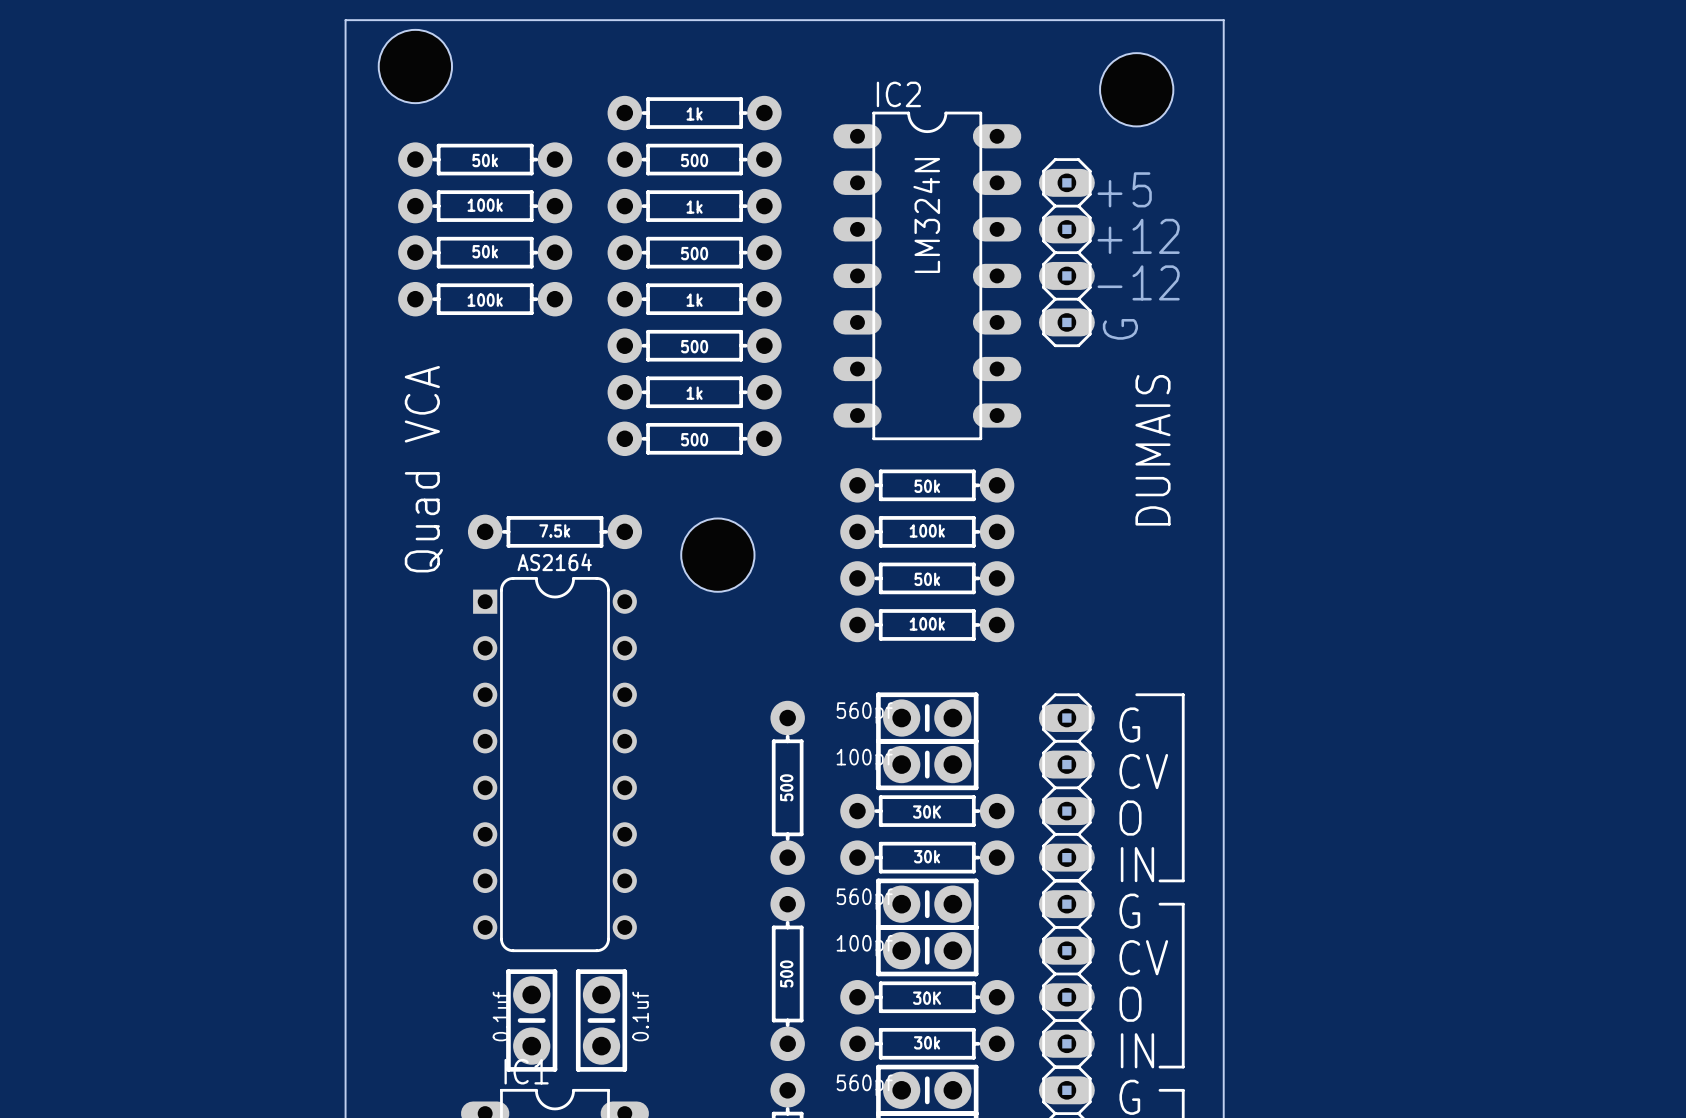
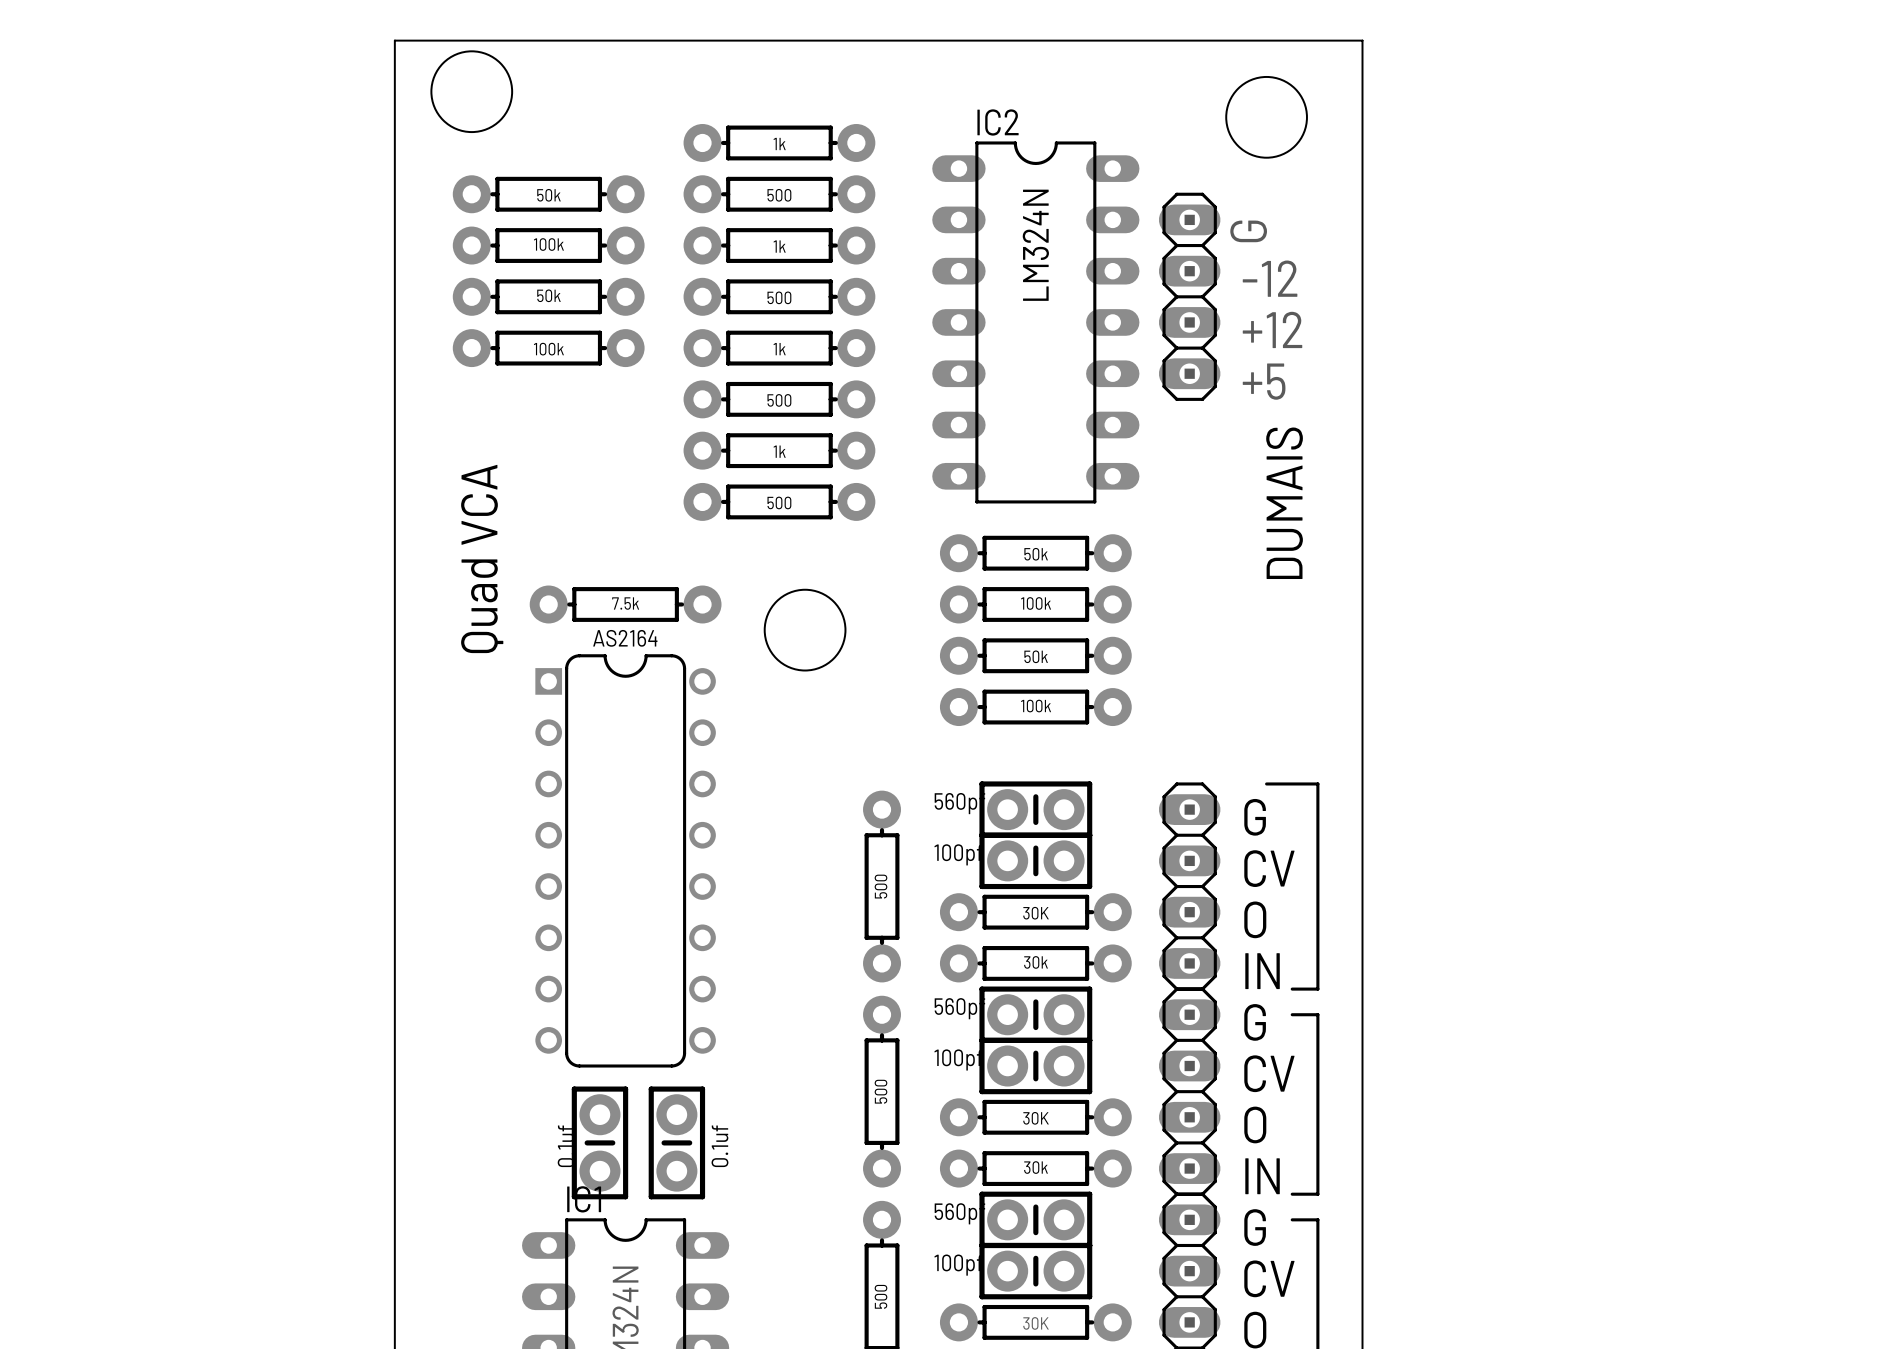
text position: +5 (1124, 189) -> +5 (1264, 381)
text position: +12 (1138, 236) -> +12 (1272, 329)
text position: -12 (1138, 282) -> -12 (1270, 278)
text position: G (1120, 329) -> G (1248, 231)

